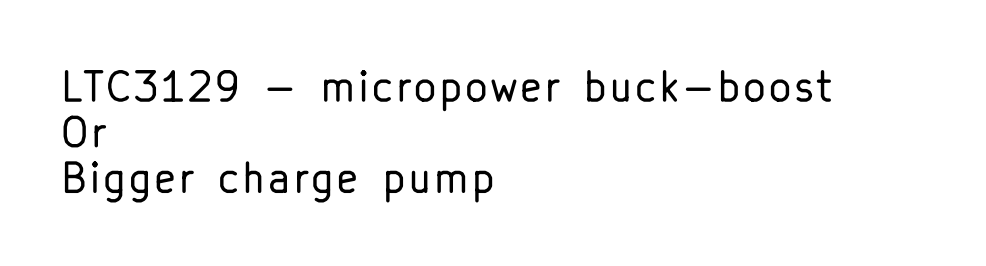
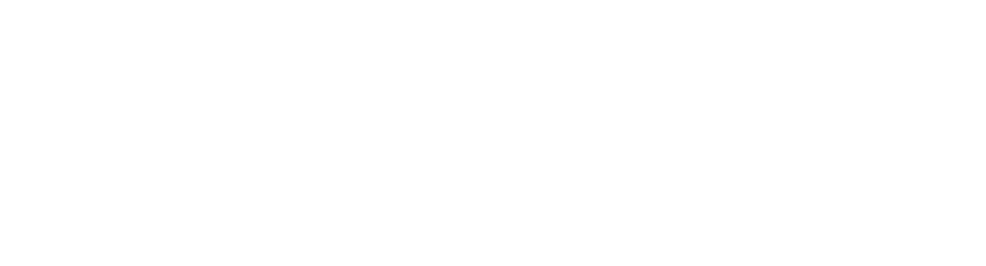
text: LTC3129 - micropower buck-boost (447, 90) -> none
text: Or (84, 131) -> none
text: Bigger charge pump (278, 181) -> none

